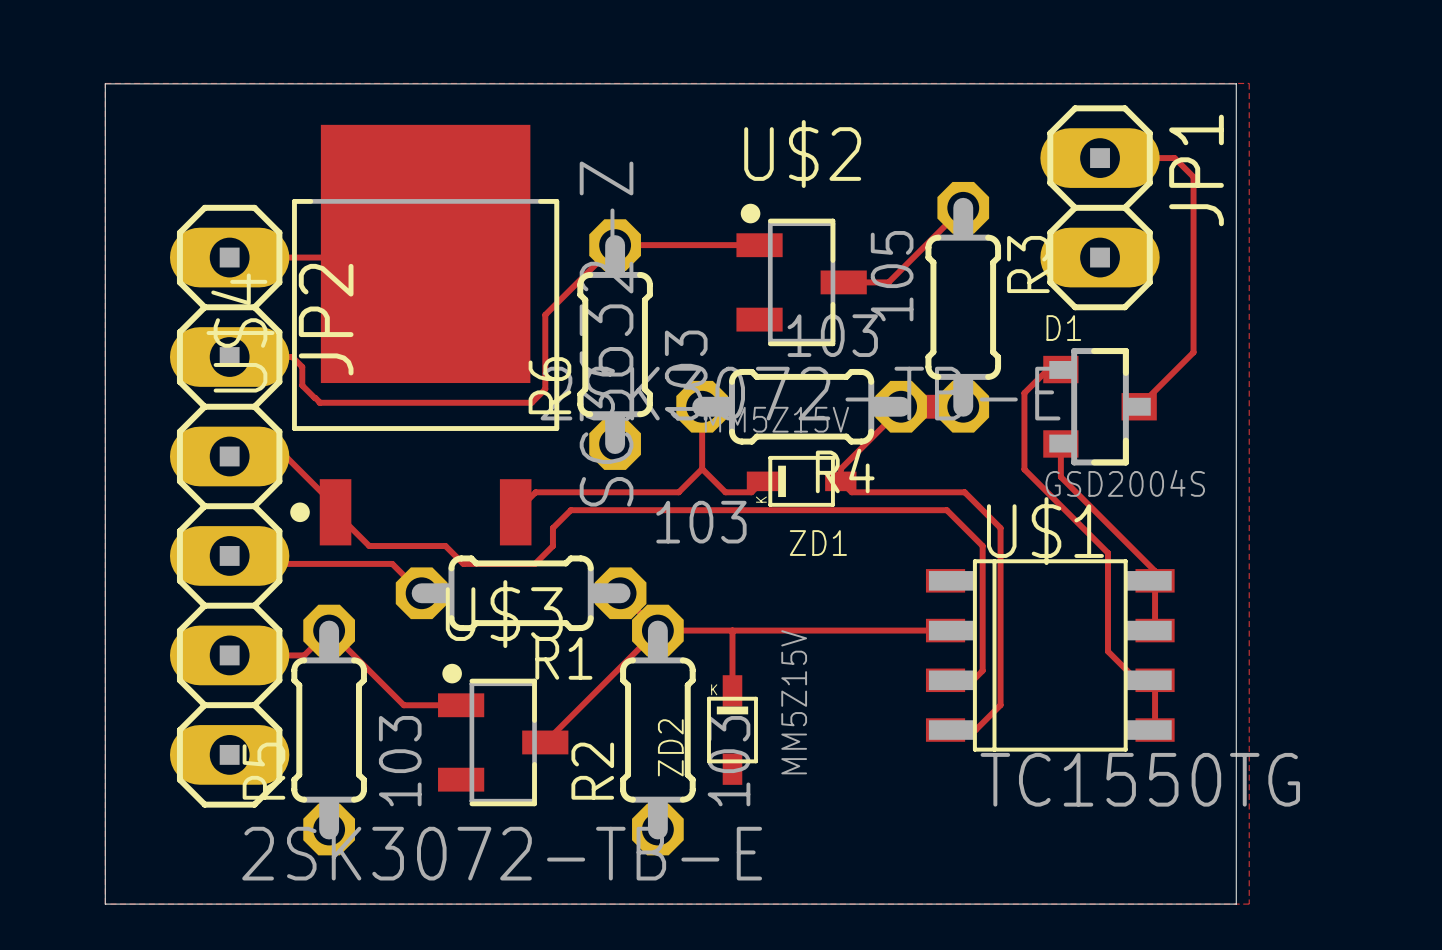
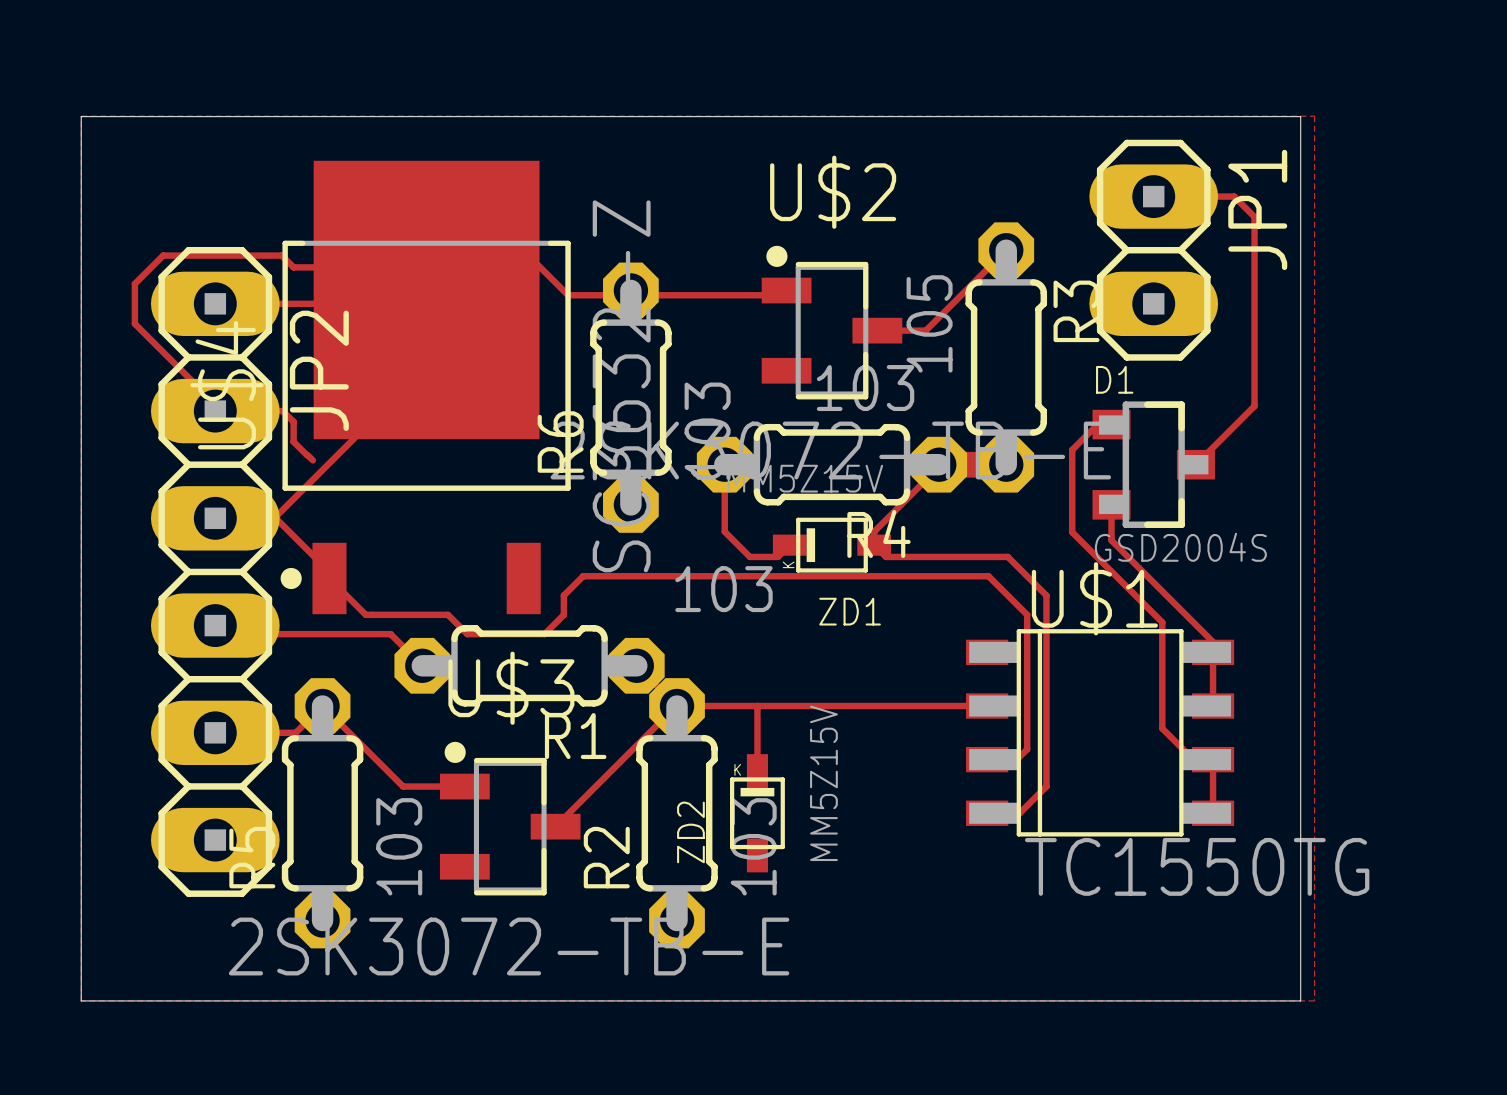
top track: (759, 245) (615, 245) (545, 314) (545, 389) (531, 402) (319, 402) -> (786, 290) (781, 295) (568, 295) (509, 236) (384, 236) (354, 267) (293, 267) (281, 255) (163, 255) (134, 283) (134, 323) (215, 404) (215, 411)
top track: none -> (416, 346) (416, 376) (274, 518)
top track: (702, 468) (678, 492) (535, 492) (515, 512) -> none

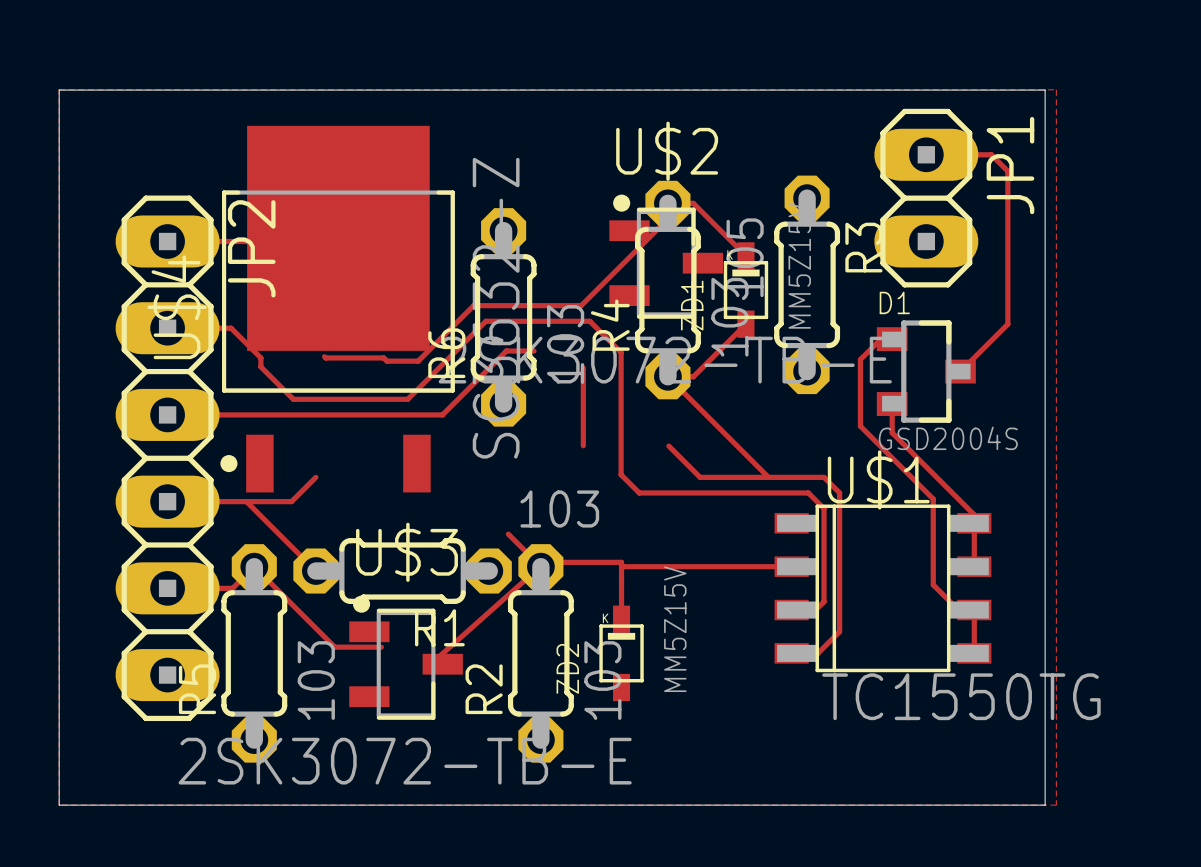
top track: (1006, 250) (925, 330) (877, 330) -> none
top track: (786, 290) (781, 295) (568, 295) (509, 236) (384, 236) (354, 267) (293, 267) (281, 255) (163, 255) (134, 283) (134, 323) (215, 404) (215, 411) -> none
top track: none -> (745, 255) (693, 203) (667, 203) (667, 218) (581, 305) (473, 305) (418, 361) (386, 361) (383, 357) (324, 356)
top track: (416, 346) (416, 376) (274, 518) -> (534, 351) (506, 351) (442, 414) (216, 414)
JP2 name position: JP2 (319, 370) -> JP2 (251, 248)
top track: none -> (745, 324) (693, 376) (667, 376) (768, 477)
top track: (282, 411) (293, 421) (293, 441) (306, 455) -> none
top track: (307, 455) (312, 460) -> none
top track: none -> (583, 368) (583, 445)
top track: (724, 464) (724, 531) (749, 556) (777, 556) (789, 545) -> none
R4 rotation: 0° (831, 464) -> 90° clockwise (667, 290)
top track: (1006, 464) (939, 464) (874, 531) (874, 545) (886, 556) (1007, 556) (1046, 595) (1046, 614) -> (668, 446) (700, 477) (824, 477) (839, 492)
top track: (275, 518) (329, 571) (329, 578) (365, 614) (448, 614) (467, 634) (544, 634) (563, 614) (563, 595) (583, 576) (988, 576) (1027, 614) (1027, 634) -> (222, 328) (231, 328) (260, 357) (260, 366) (293, 399) (407, 399) (485, 321) (589, 321) (621, 352) (621, 474) (639, 492) (808, 492) (824, 508)
ZD1 rotation: 0° (831, 545) -> 90° clockwise (745, 290)
ZD1 position: (831, 545) -> (745, 290)
top track: (254, 625) (263, 634) (390, 634) (422, 665) -> (199, 501) (291, 501) (315, 477)
top track: none -> (246, 501) (315, 571)
R1 position: (529, 665) -> (402, 571)
top track: none -> (543, 562) (621, 562) (621, 619)
top track: none -> (545, 562) (430, 664)
top track: (757, 706) (757, 771) -> none
top track: (776, 706) (676, 706) (555, 826) -> none
top track: (403, 786) (464, 786) -> (319, 631) (334, 647) (381, 647)
ZD2 position: (757, 813) -> (621, 653)

